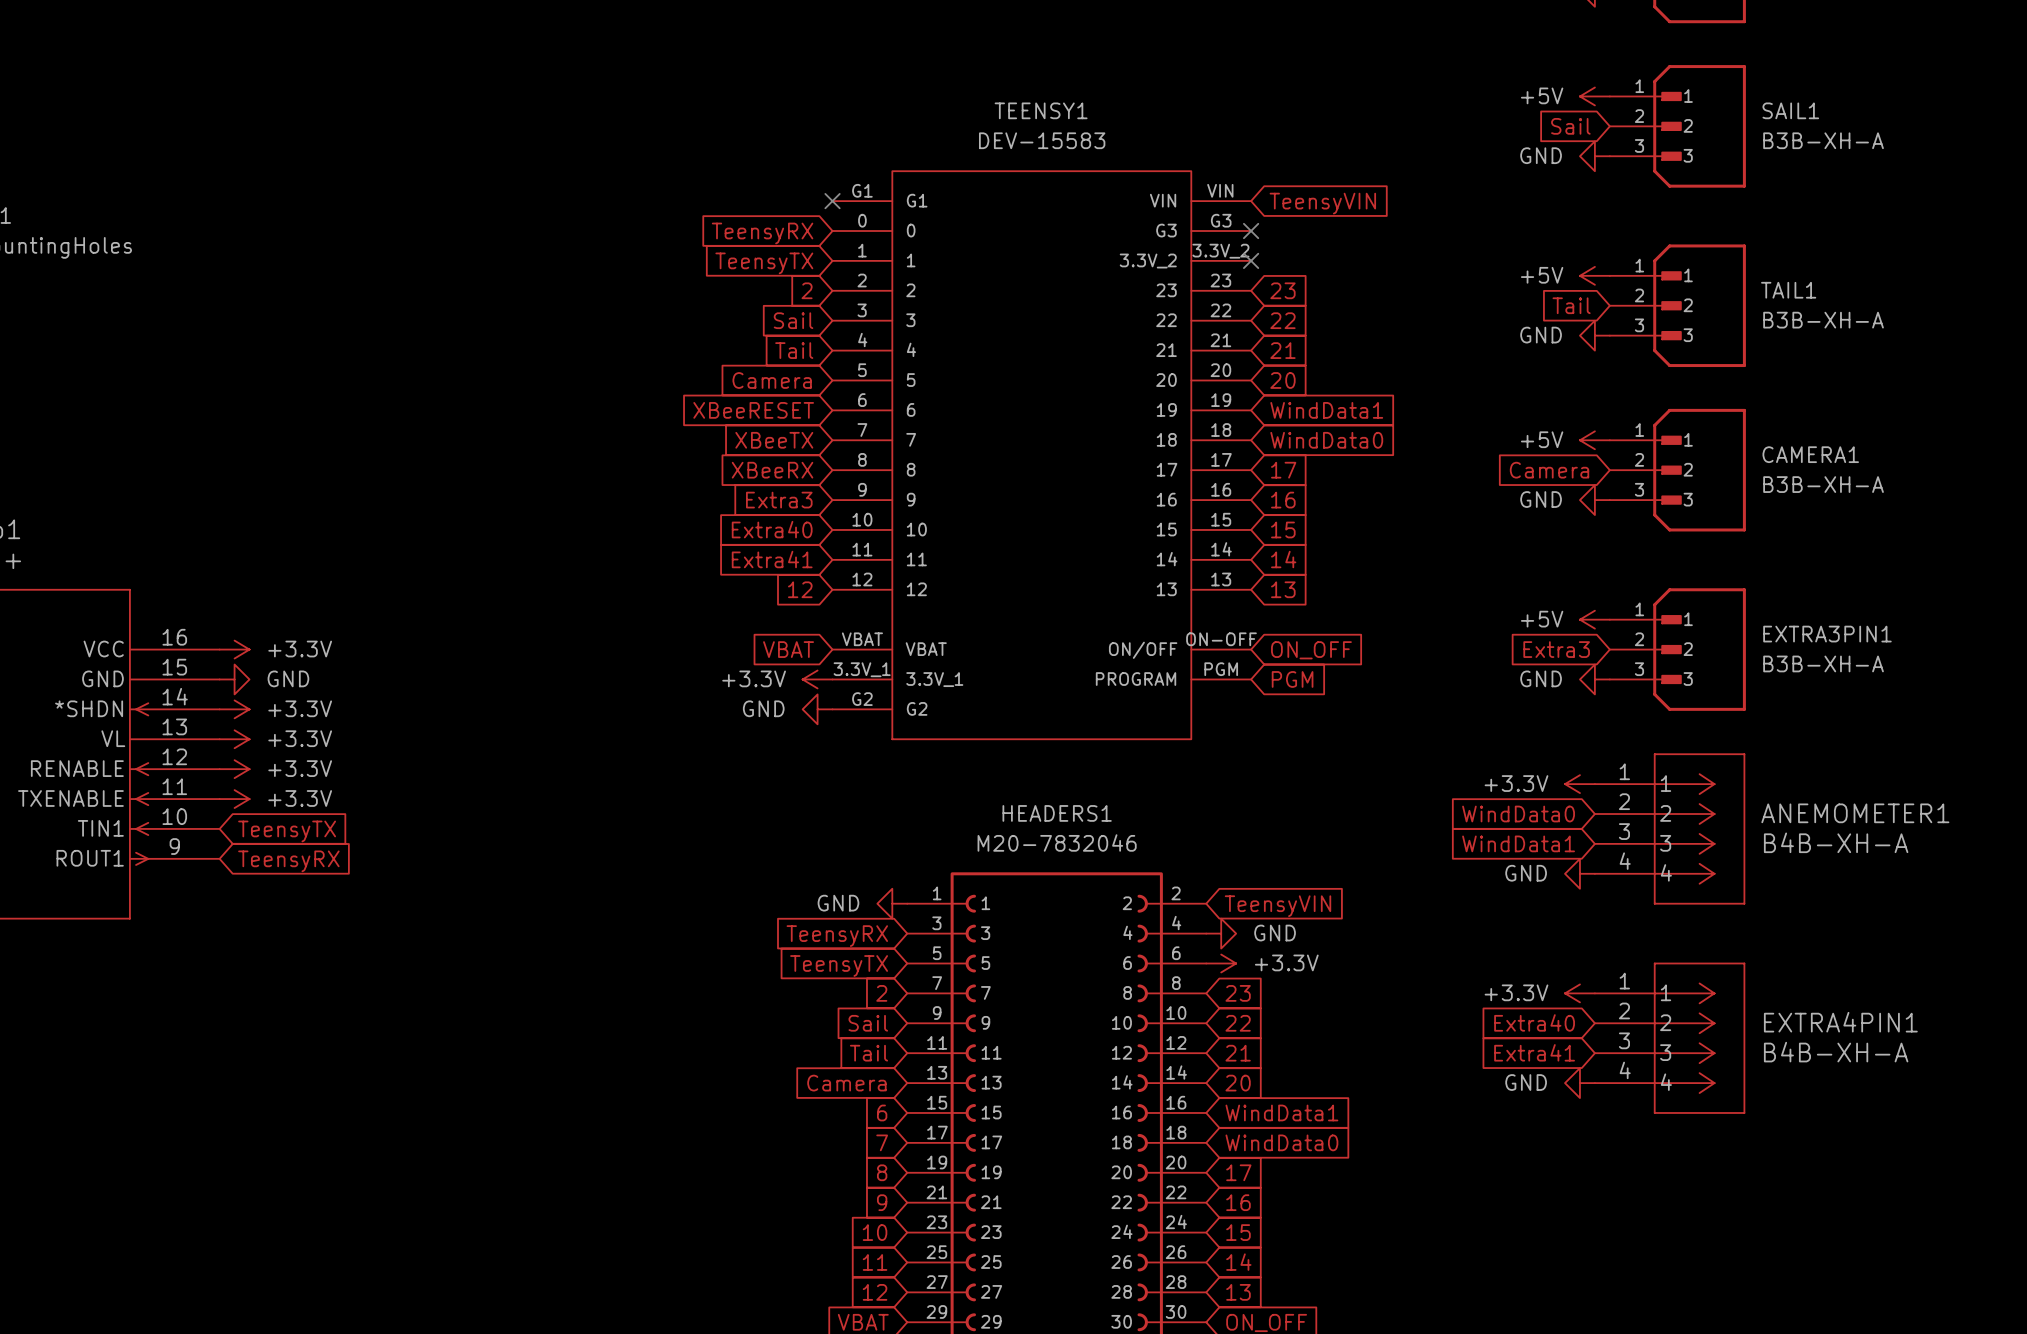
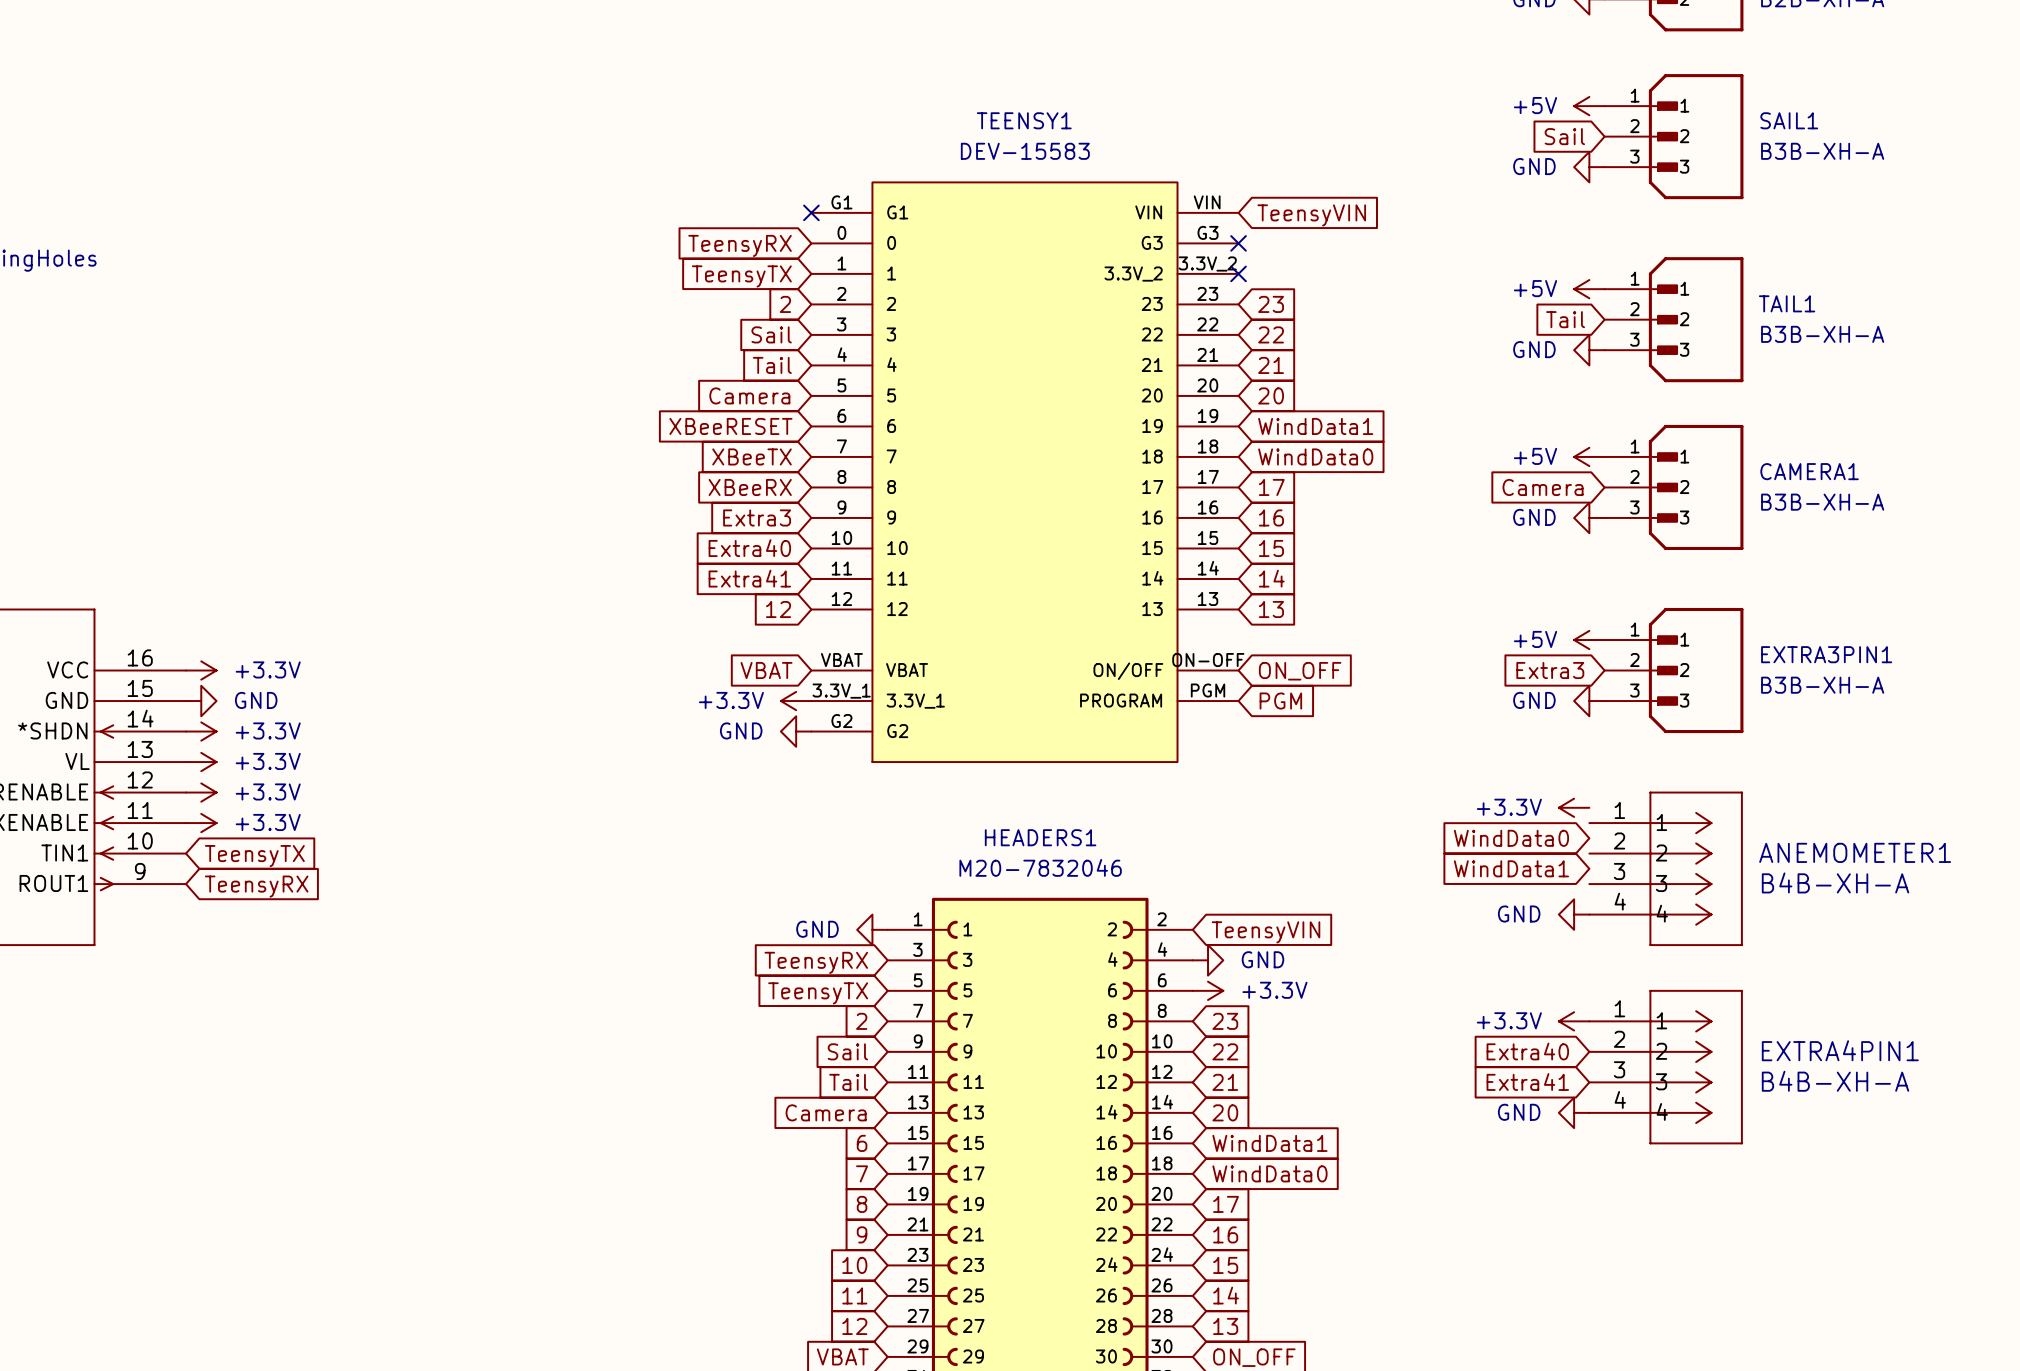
ANEMOMETER1 position: (1670, 828) -> (1666, 868)
power symbol position: GND (1579, 873) -> GND (1574, 914)

